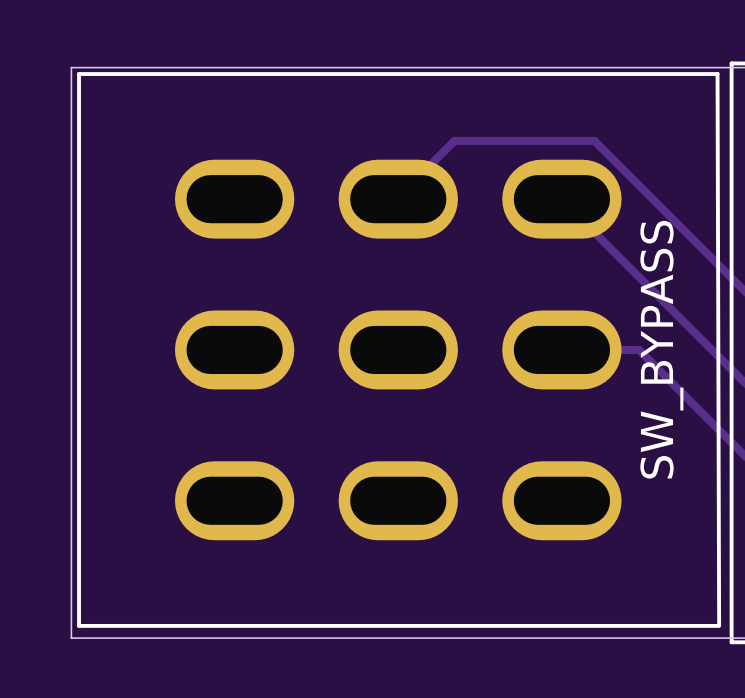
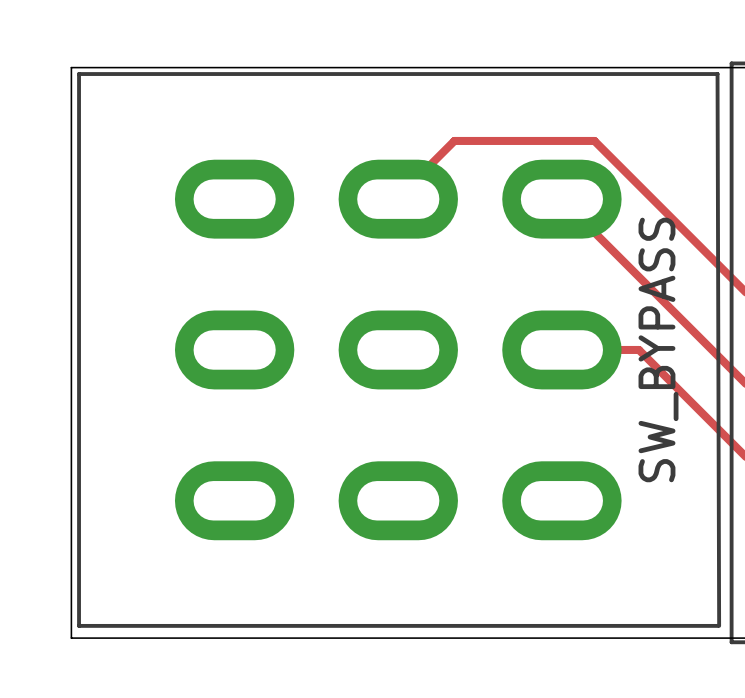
part footprint: [77, 72, 722, 628] -> [77, 72, 722, 628]

